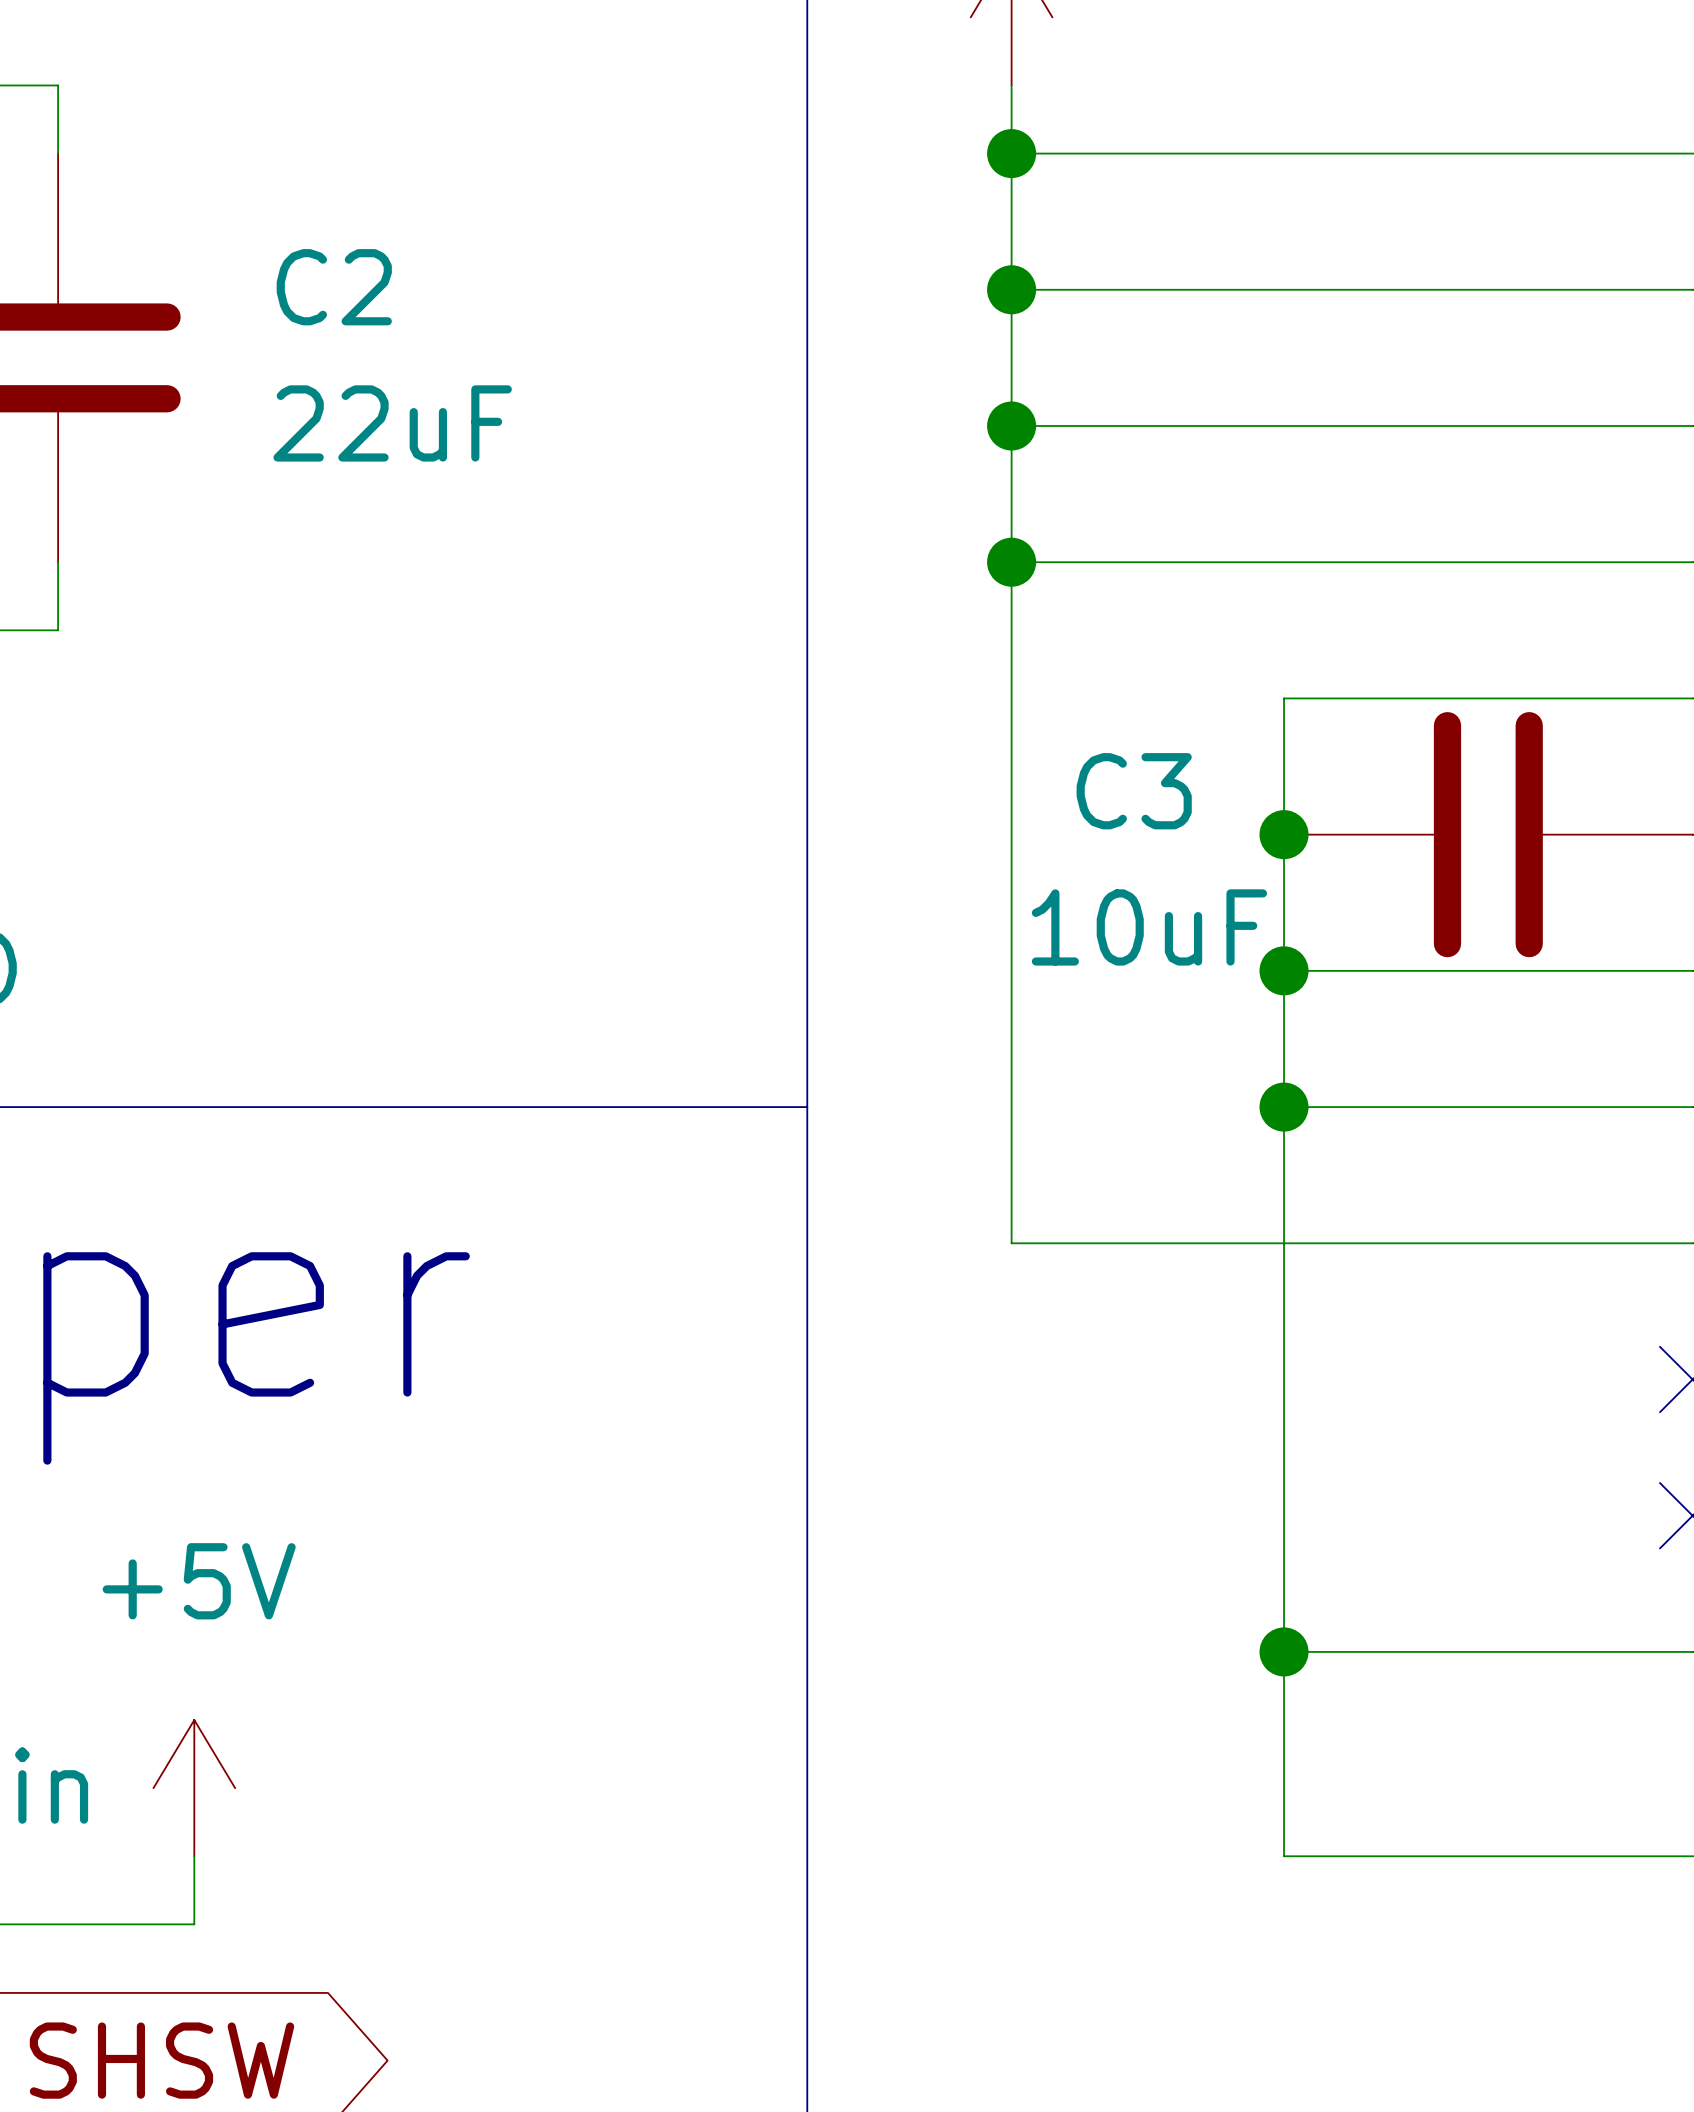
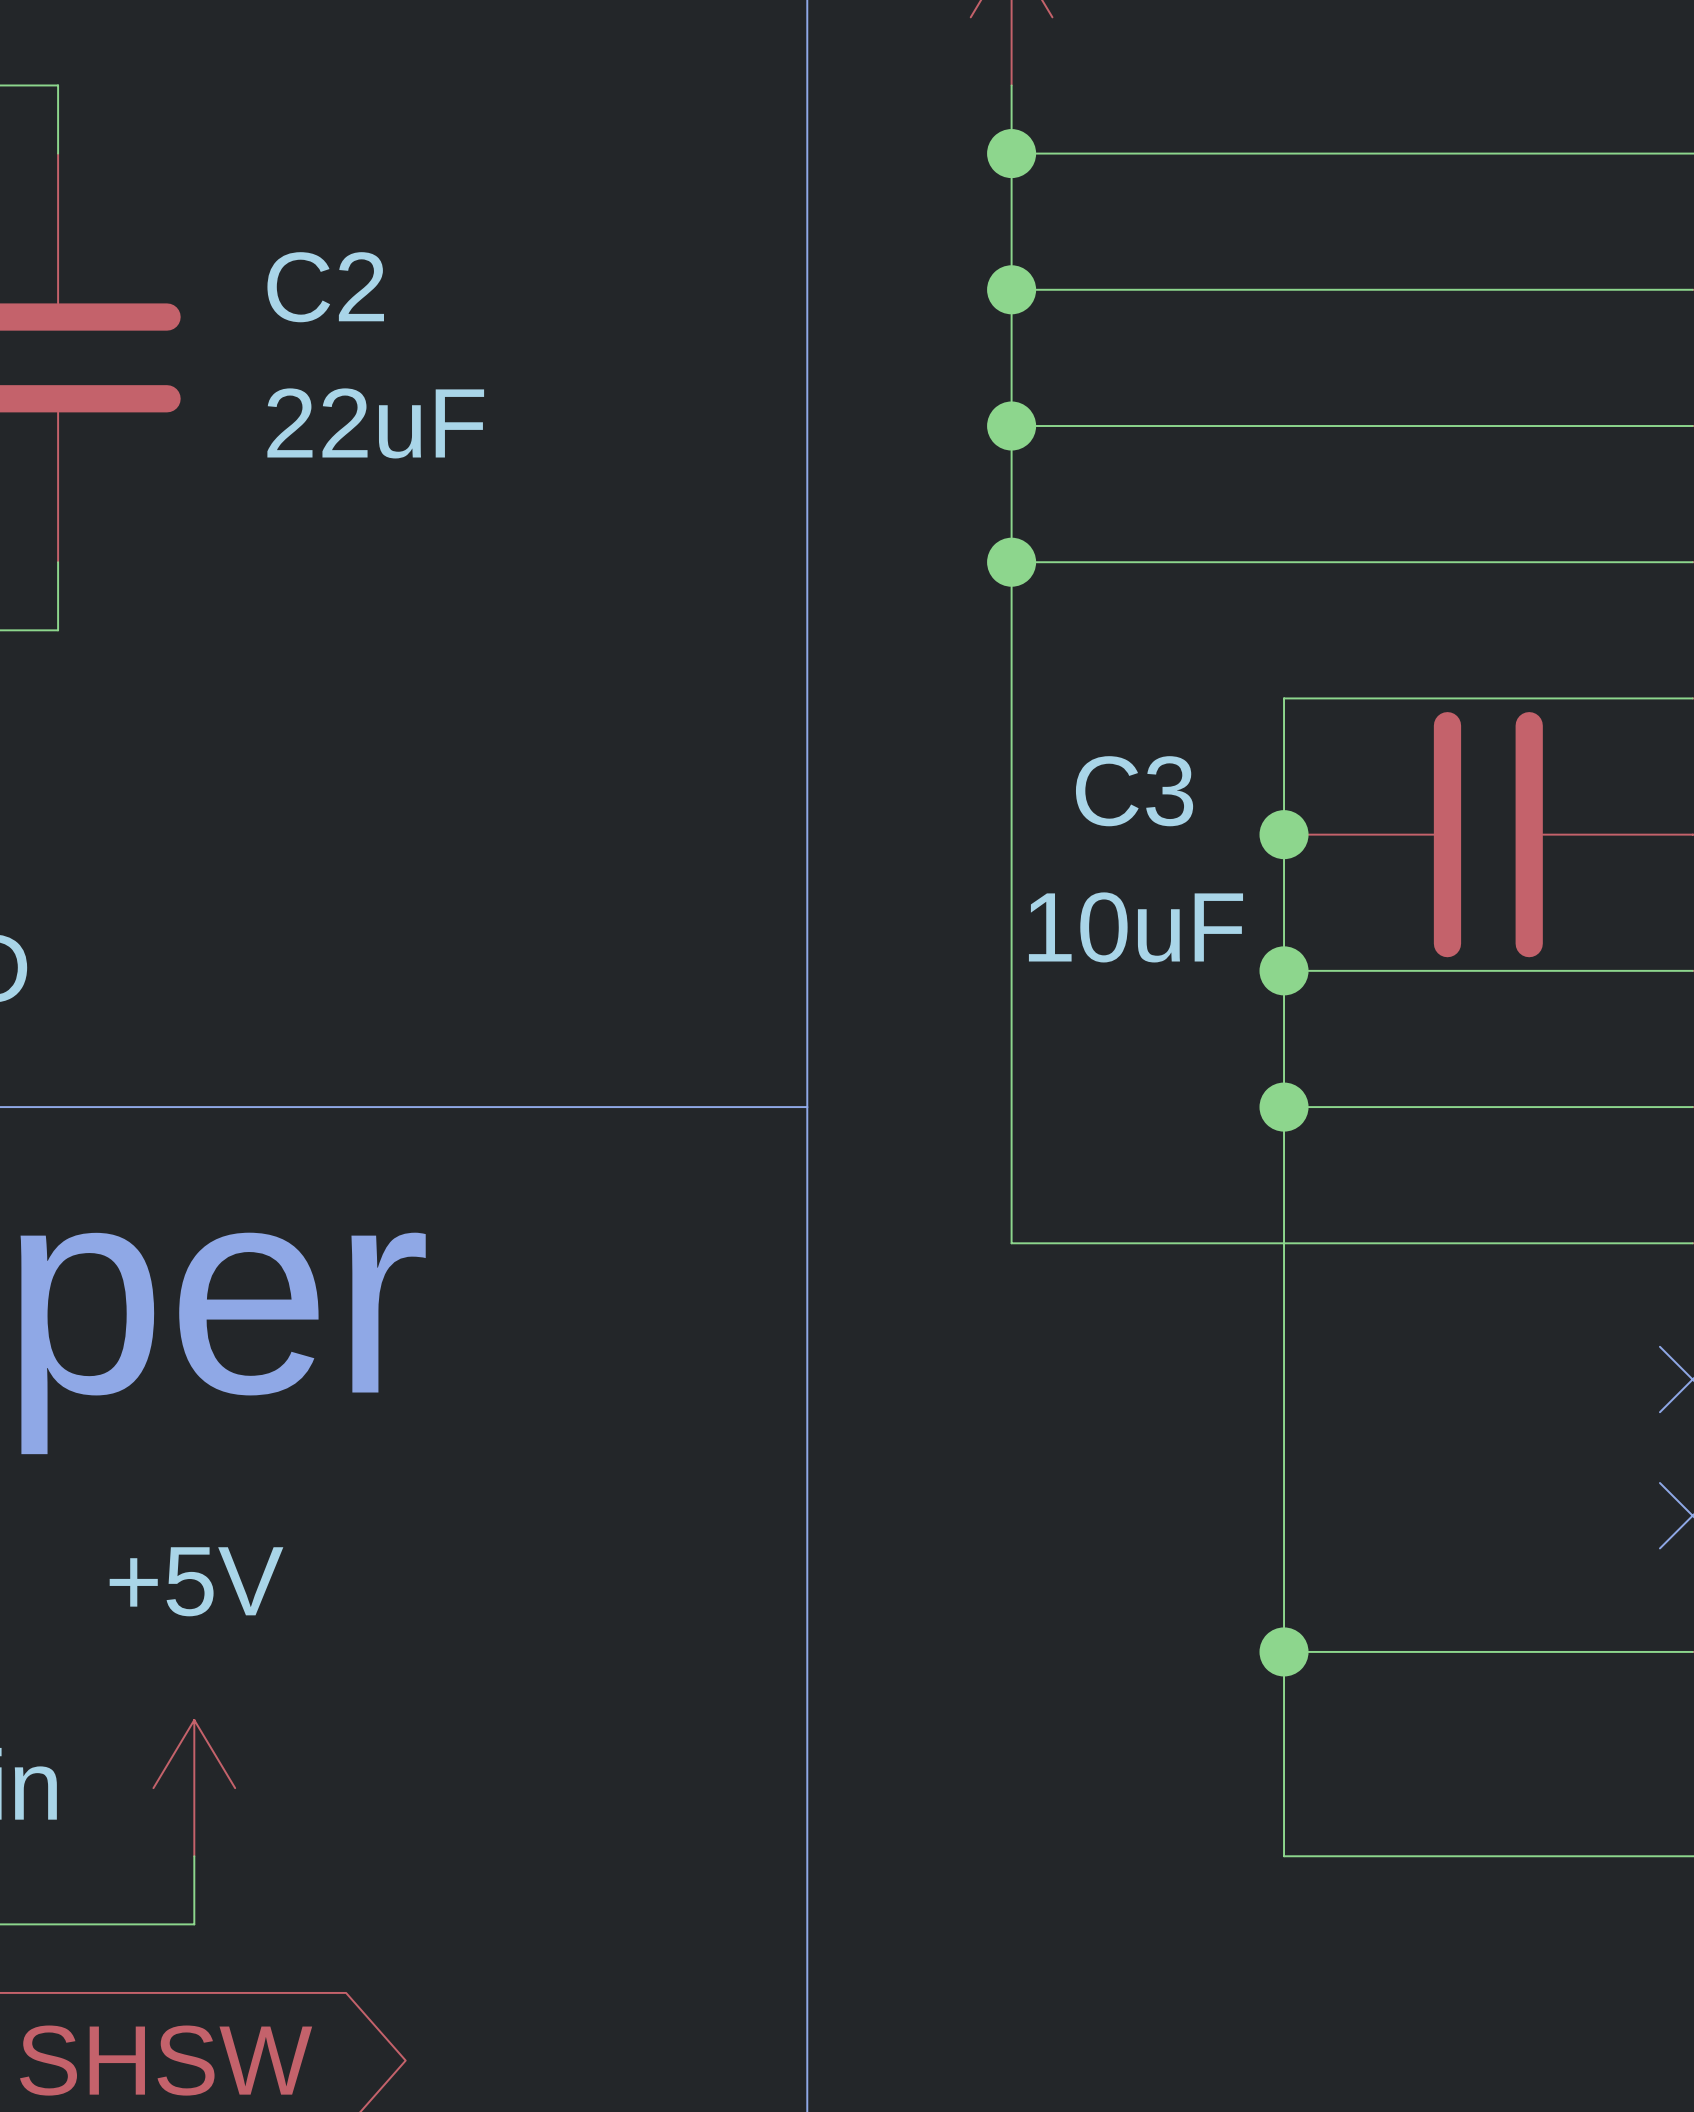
C3 value position: 10uF (1149, 927) -> 10uF (1135, 927)

